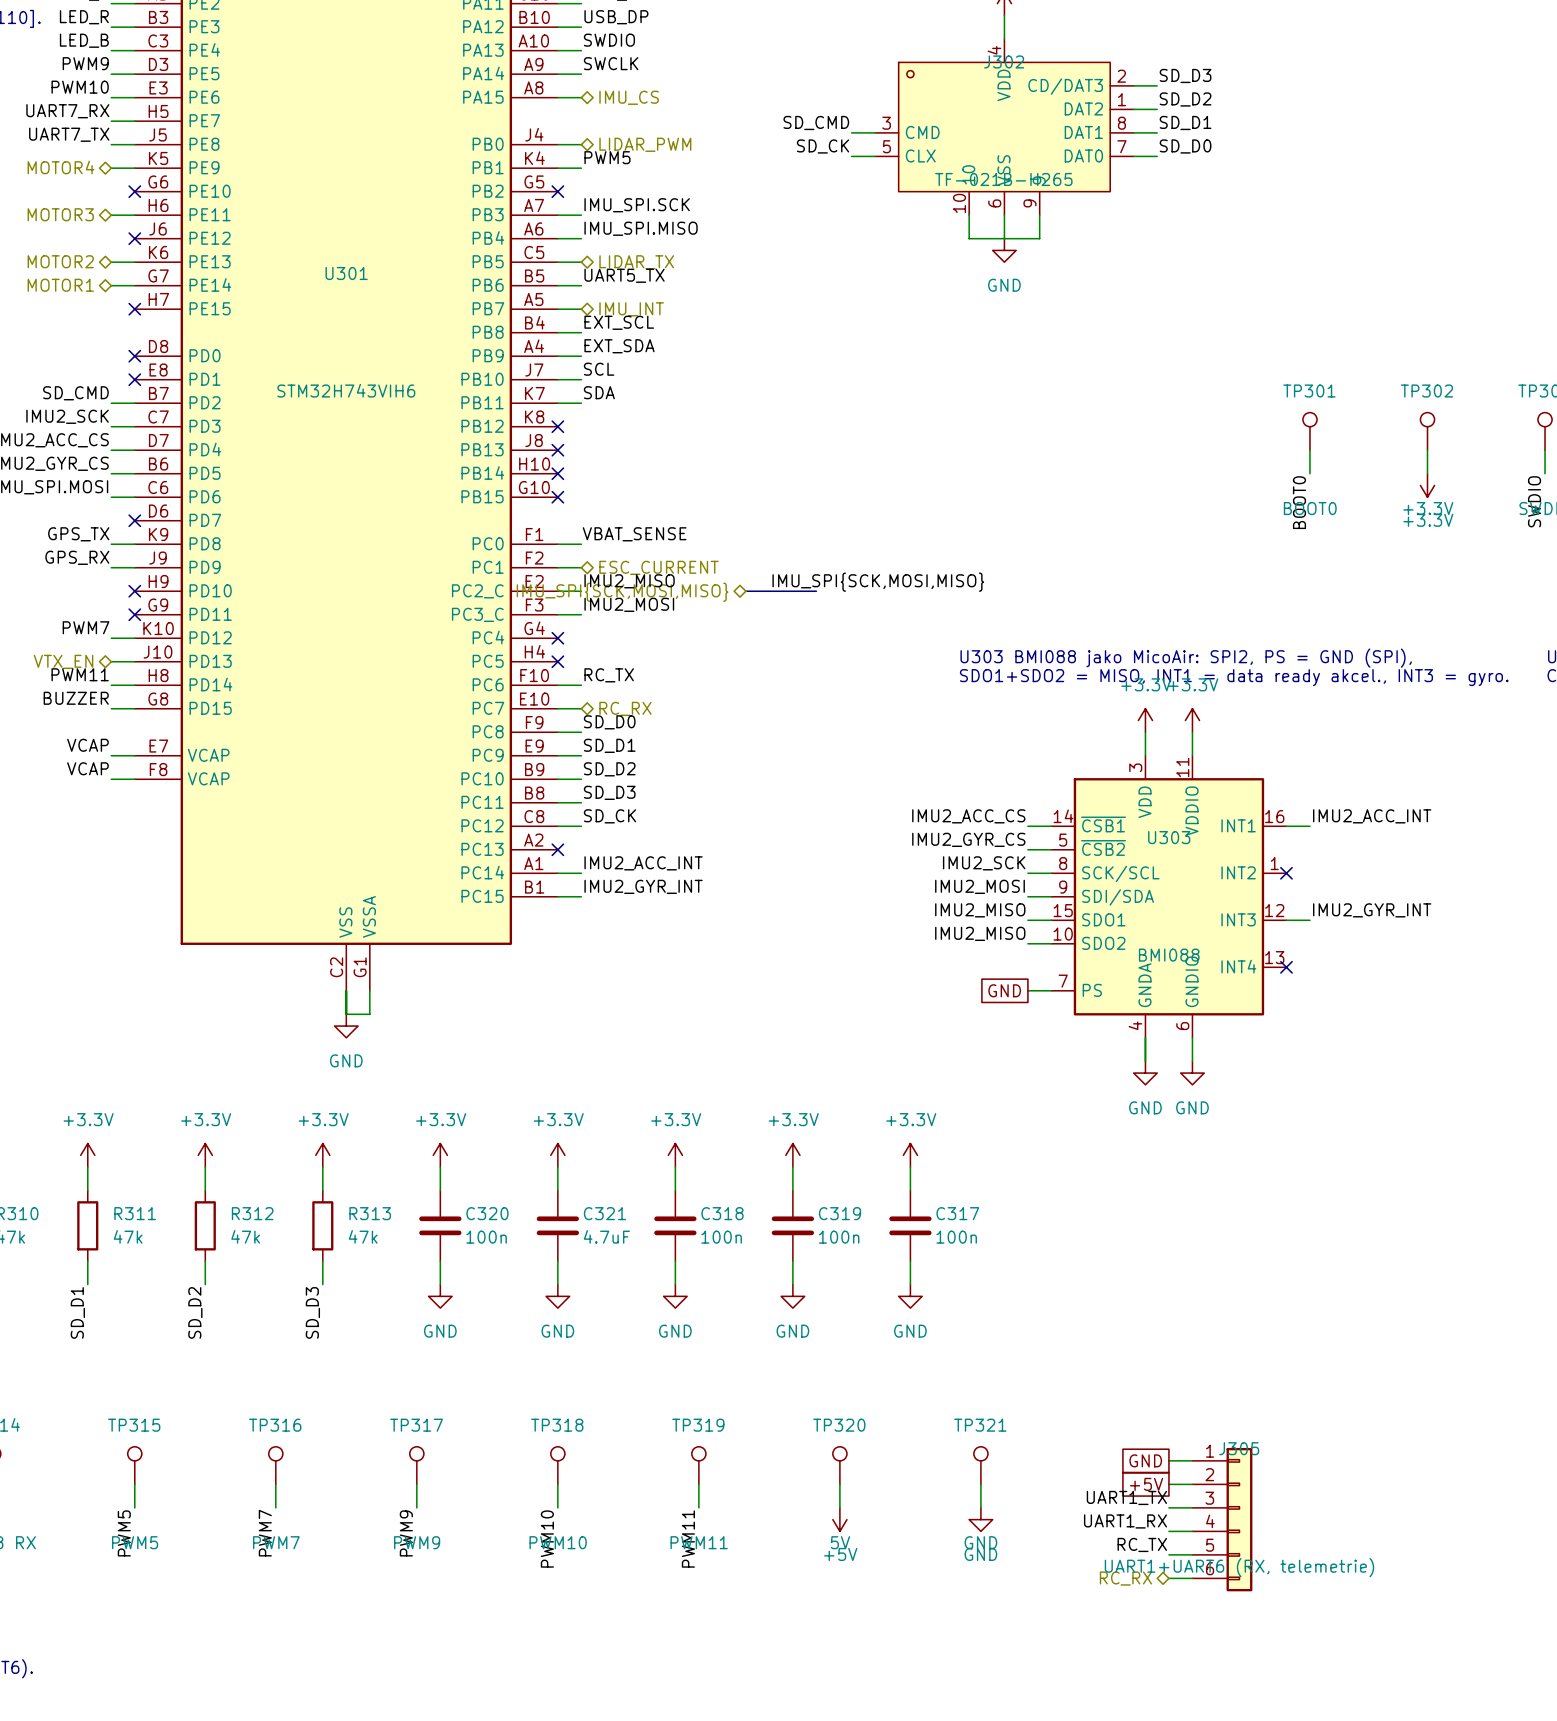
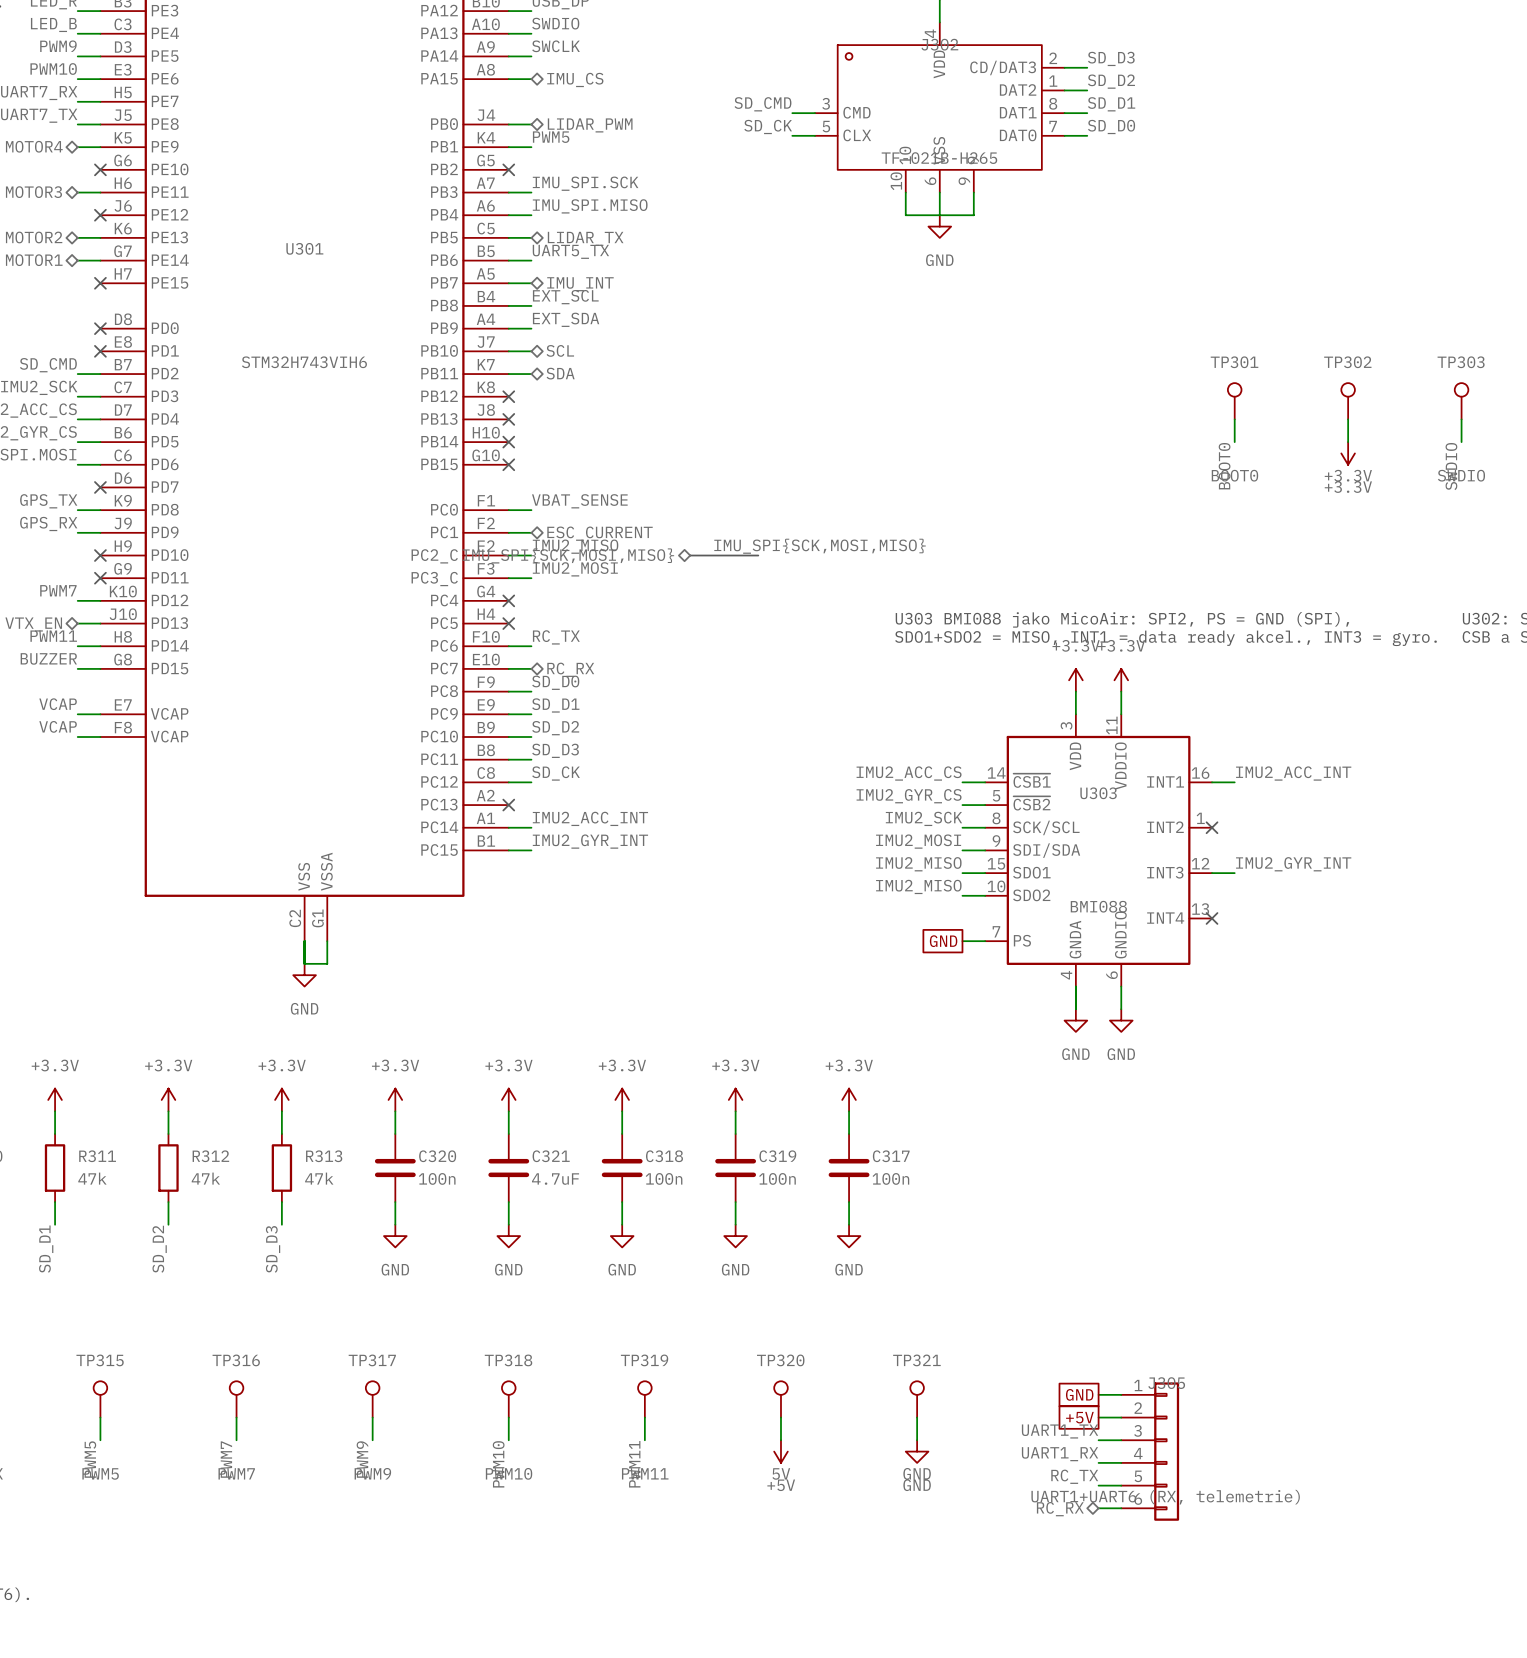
label: SCL (599, 369) -> none
hierarchical label: none -> SCL (560, 350)
label: SDA (599, 392) -> none
hierarchical label: none -> SDA (560, 373)

